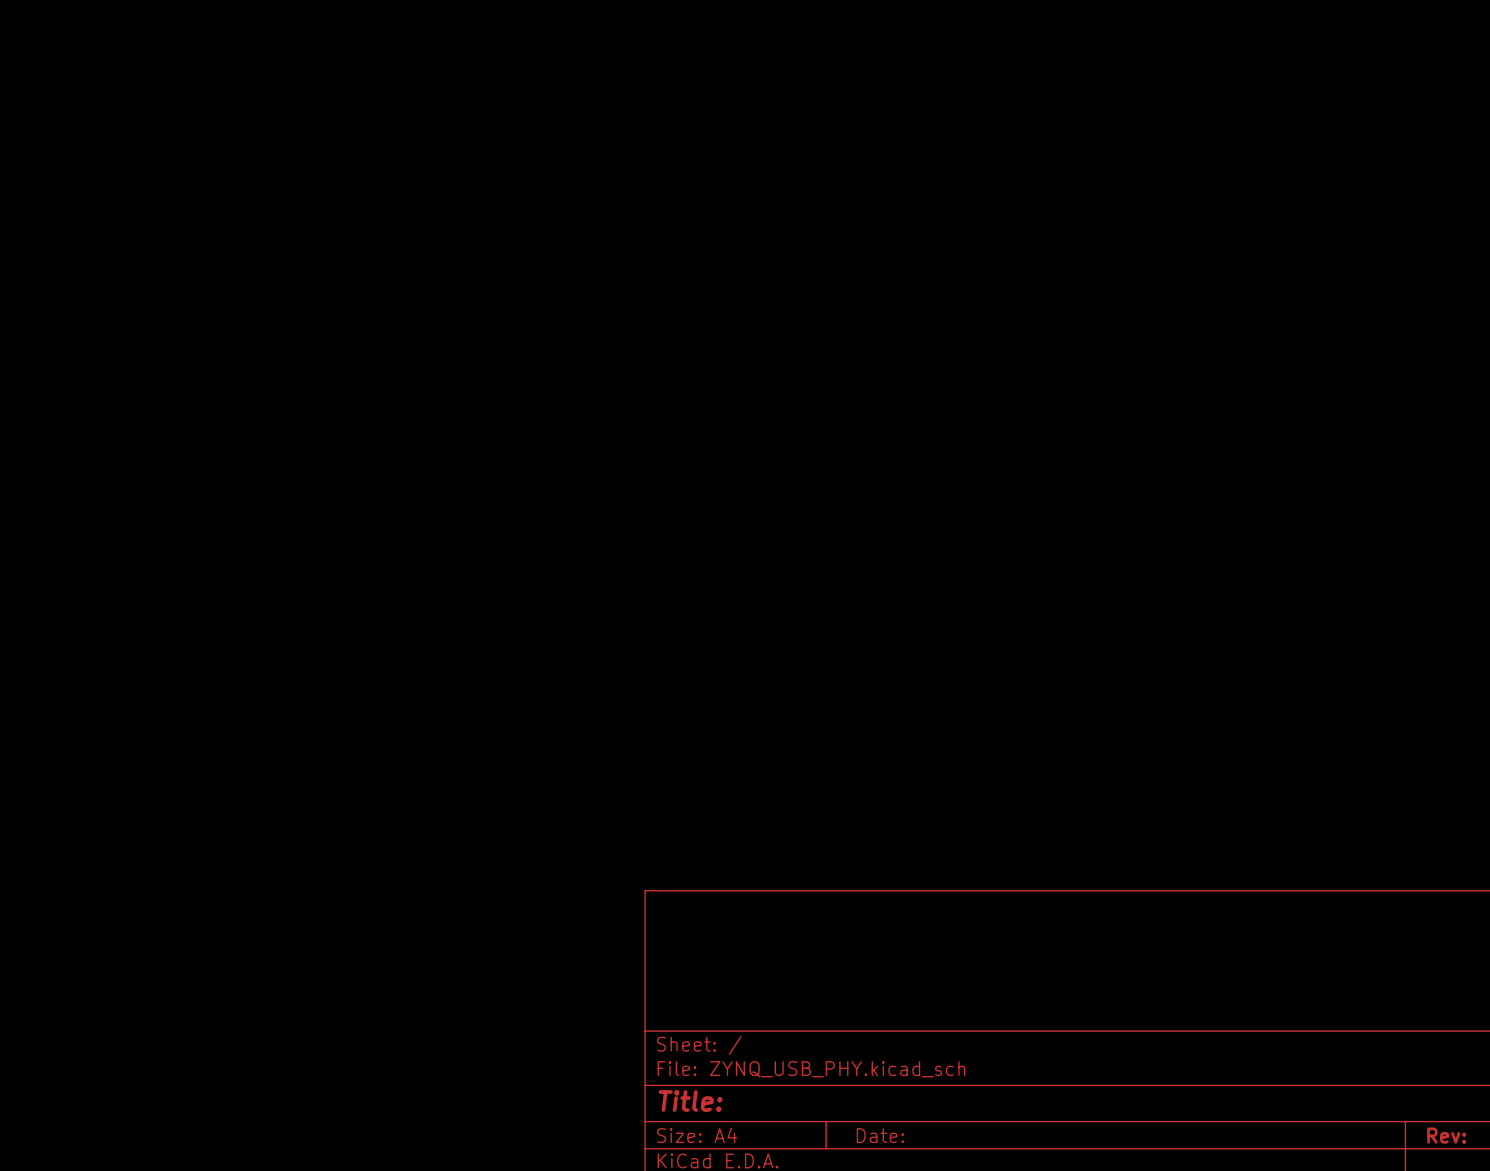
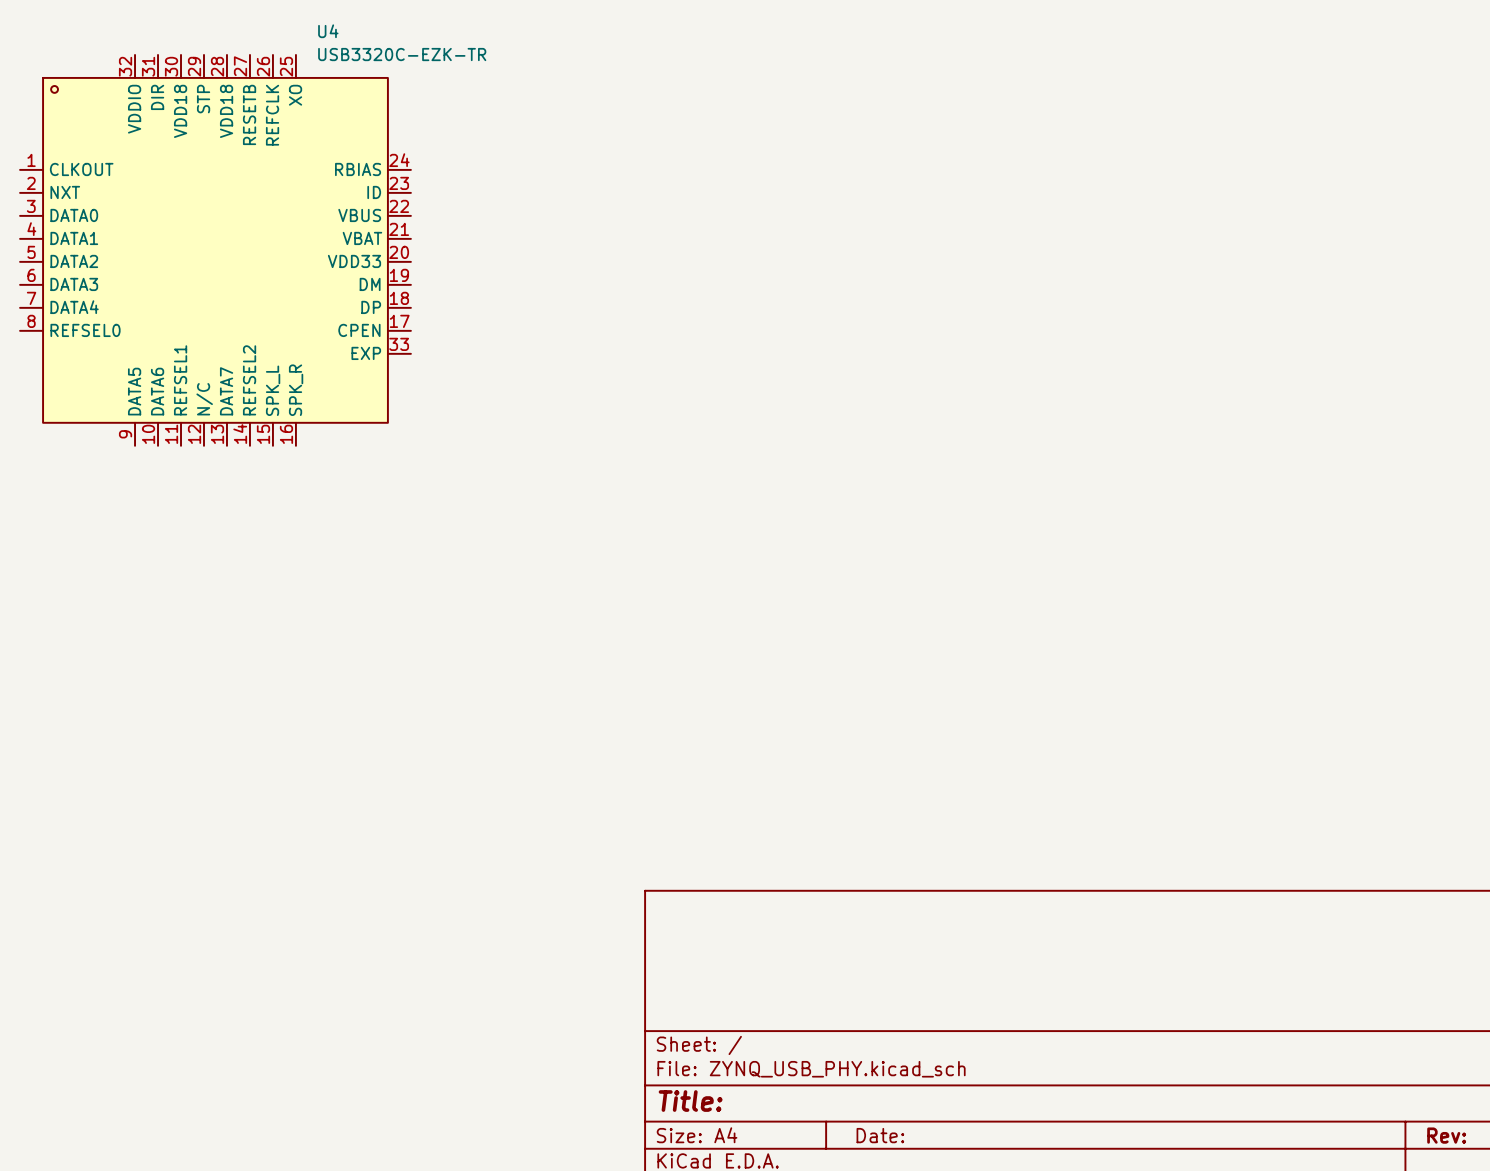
U4: none -> USB3320C-EZK-TR (215, 250)

